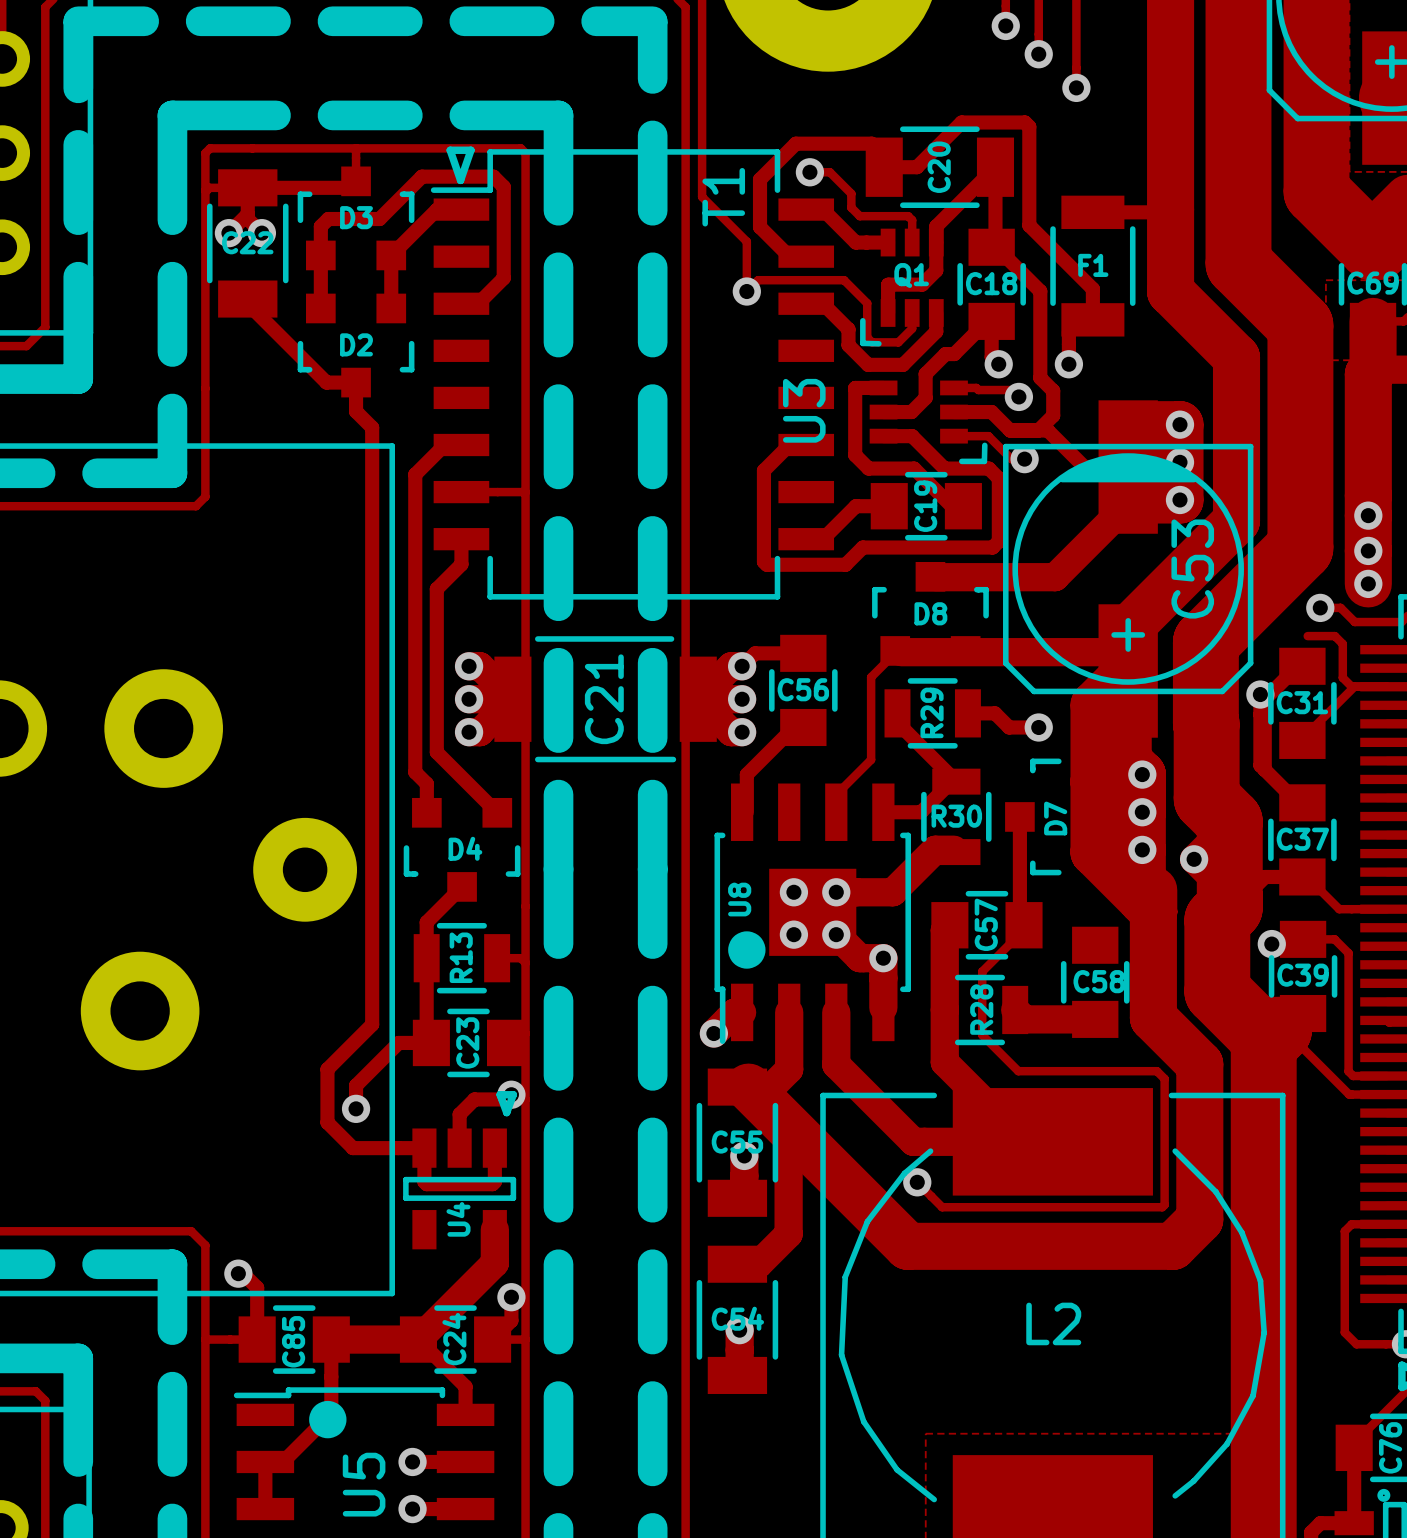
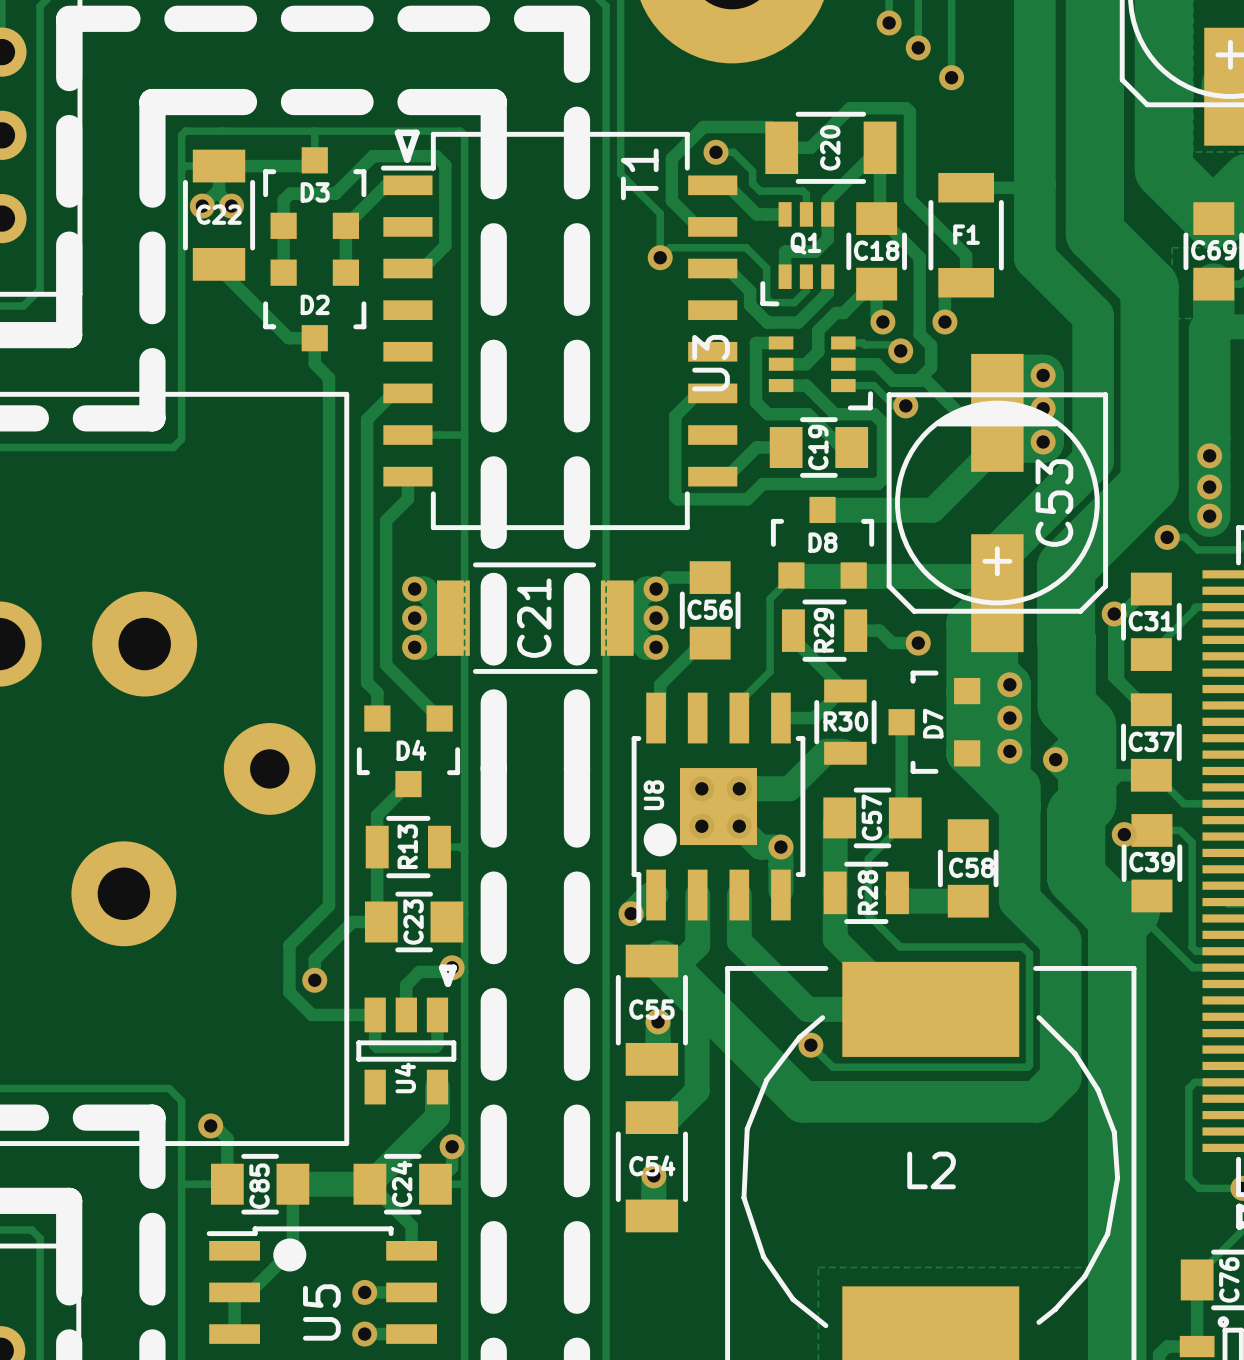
track: (1307, 636) (1334, 636) (1342, 644) (1342, 677) (1351, 686) -> none

